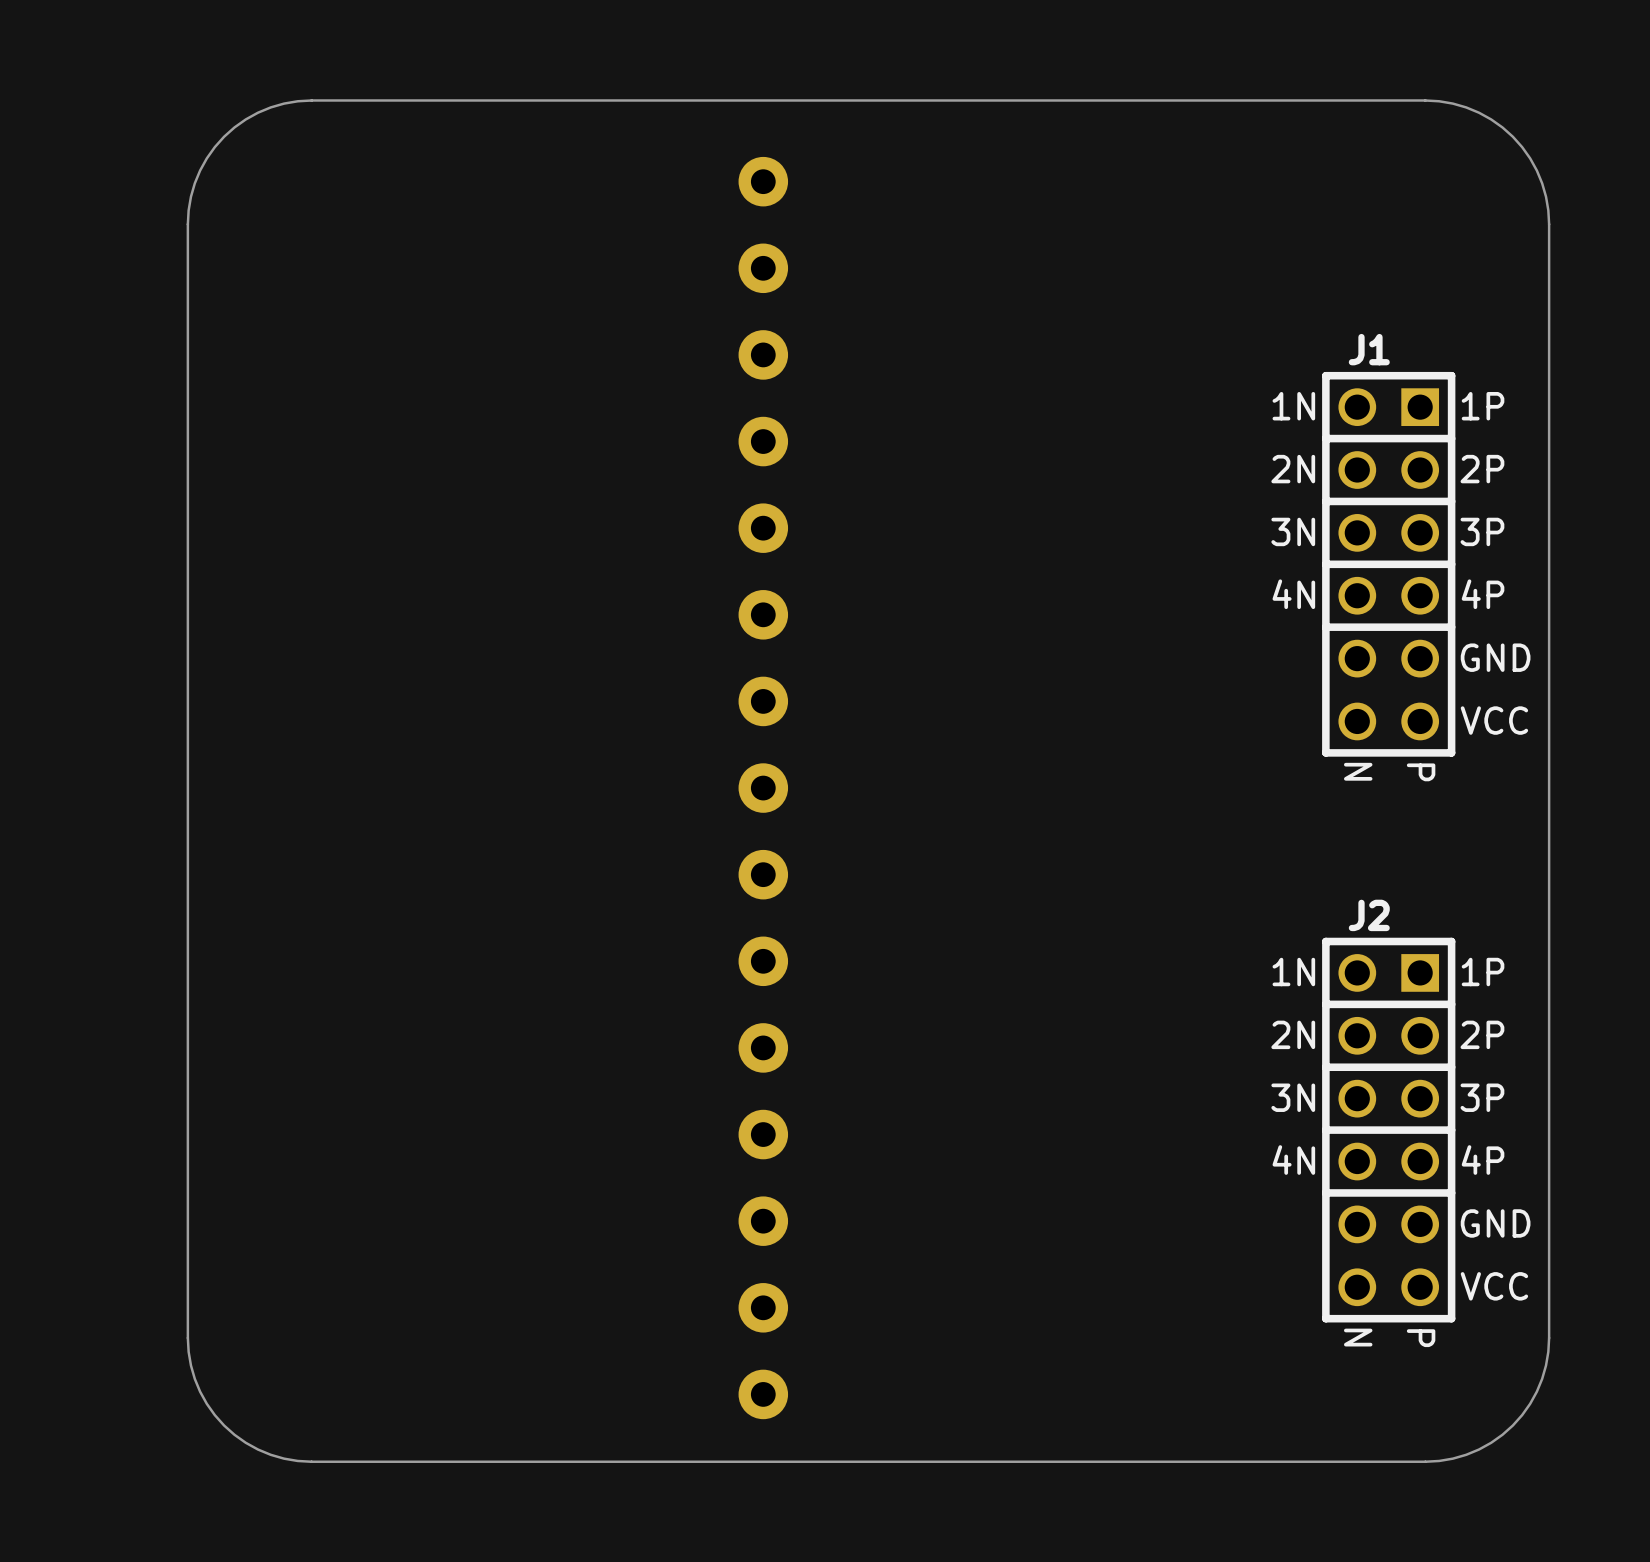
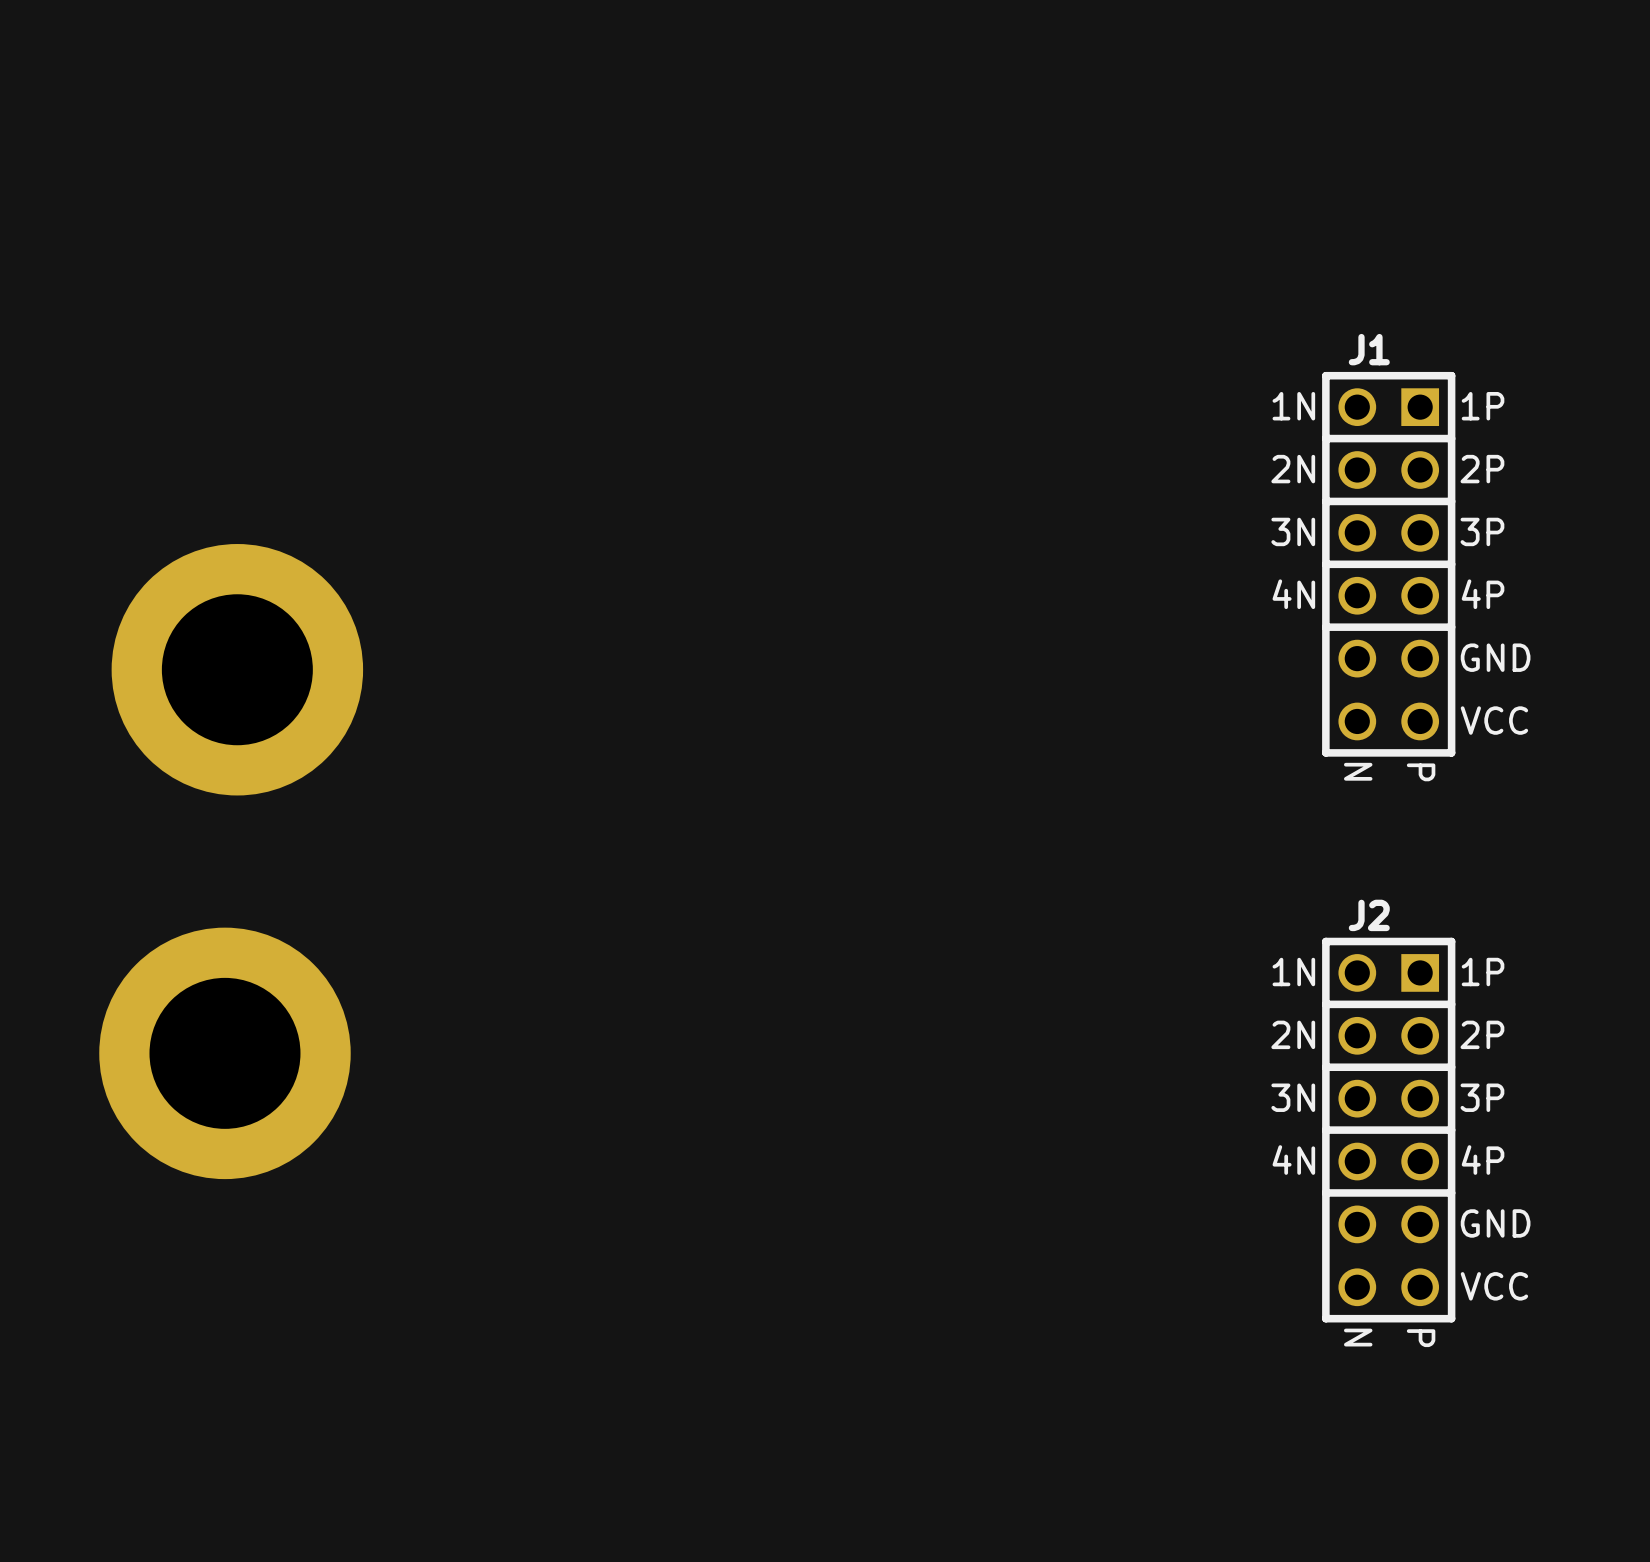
board edge: (1425, 100) (311, 100) (284, 103) (270, 107) (245, 119) (224, 136) (206, 158) (194, 183) (188, 210) (187, 224) (187, 1338) (190, 1365) (200, 1391) (206, 1403) (224, 1425) (245, 1442) (257, 1449) (284, 1458) (311, 1461) (1425, 1461) (1452, 1458) (1479, 1449) (1491, 1442) (1512, 1425) (1522, 1415) (1536, 1391) (1546, 1365) (1549, 1338) (1548, 210) (1546, 196) (1536, 170) (1530, 158) (1512, 136) (1491, 119) (1479, 112) (1452, 103) (1425, 100) -> none
part: (763, 181) -> none
part: (763, 268) -> none
part: (763, 354) -> none
part: (763, 441) -> none
part: (763, 528) -> none
part: (763, 614) -> none
part: none -> (237, 669)
part: (763, 701) -> none
part: (763, 788) -> none
part: (763, 874) -> none
part: (763, 961) -> none
part: (763, 1047) -> none
part: none -> (224, 1053)
part: (763, 1134) -> none
part: (763, 1221) -> none
part: (763, 1307) -> none
part: (763, 1394) -> none

